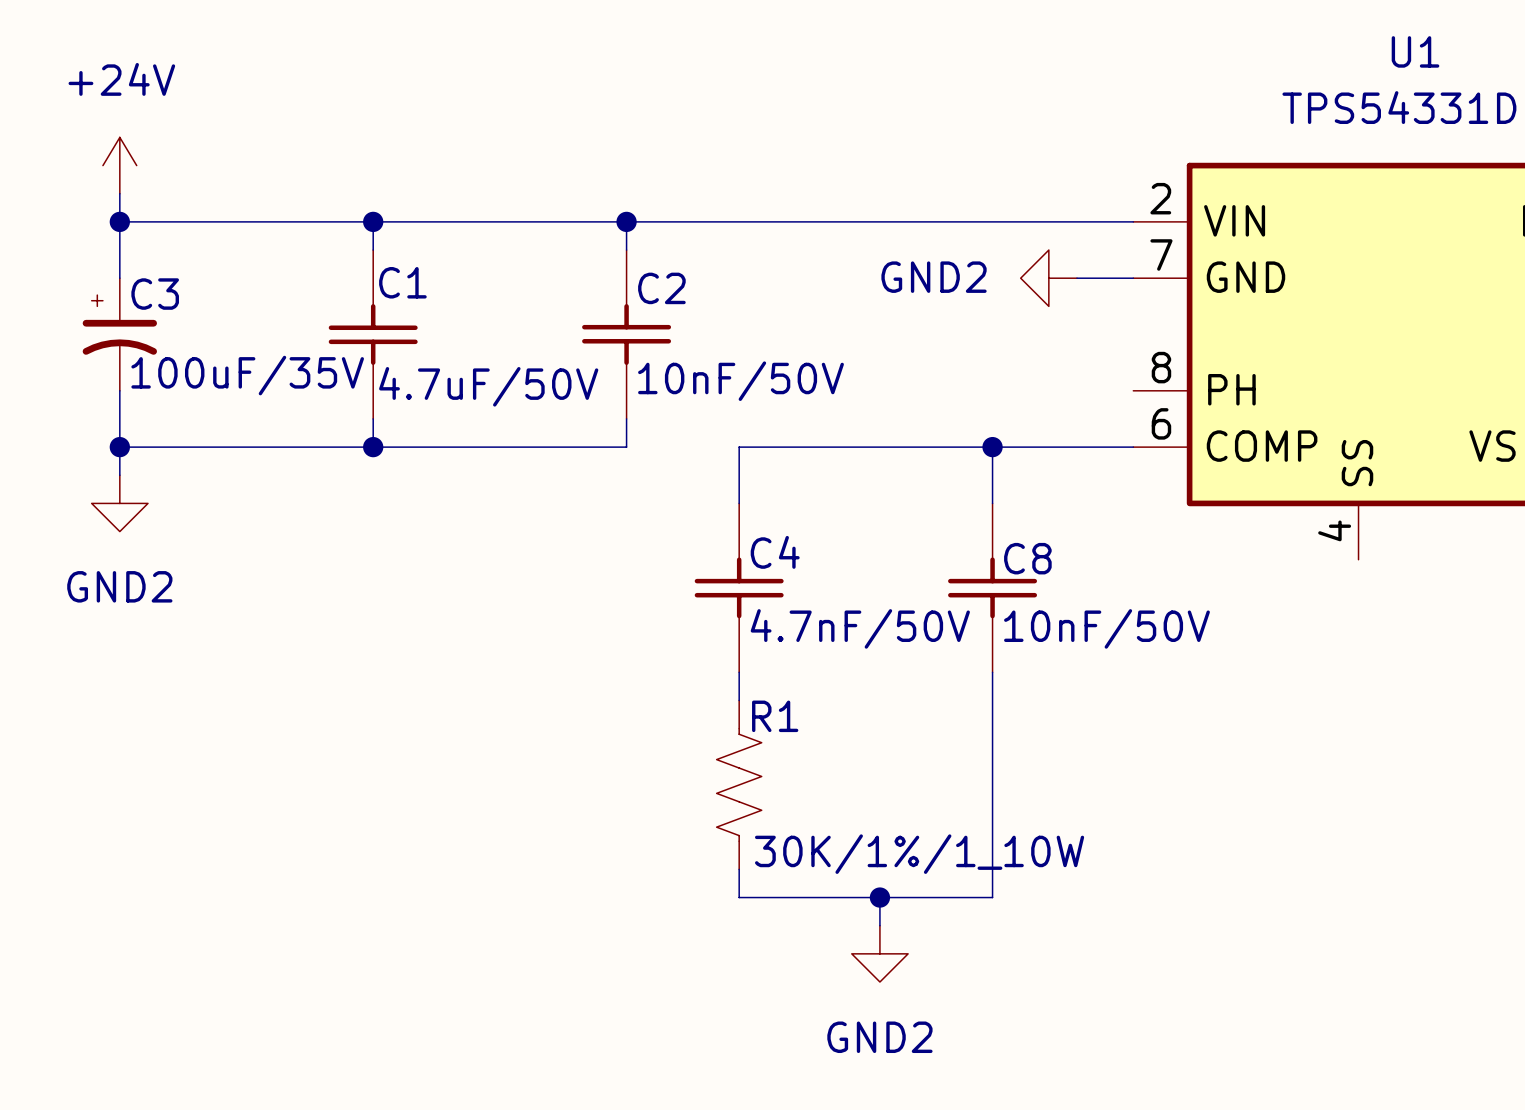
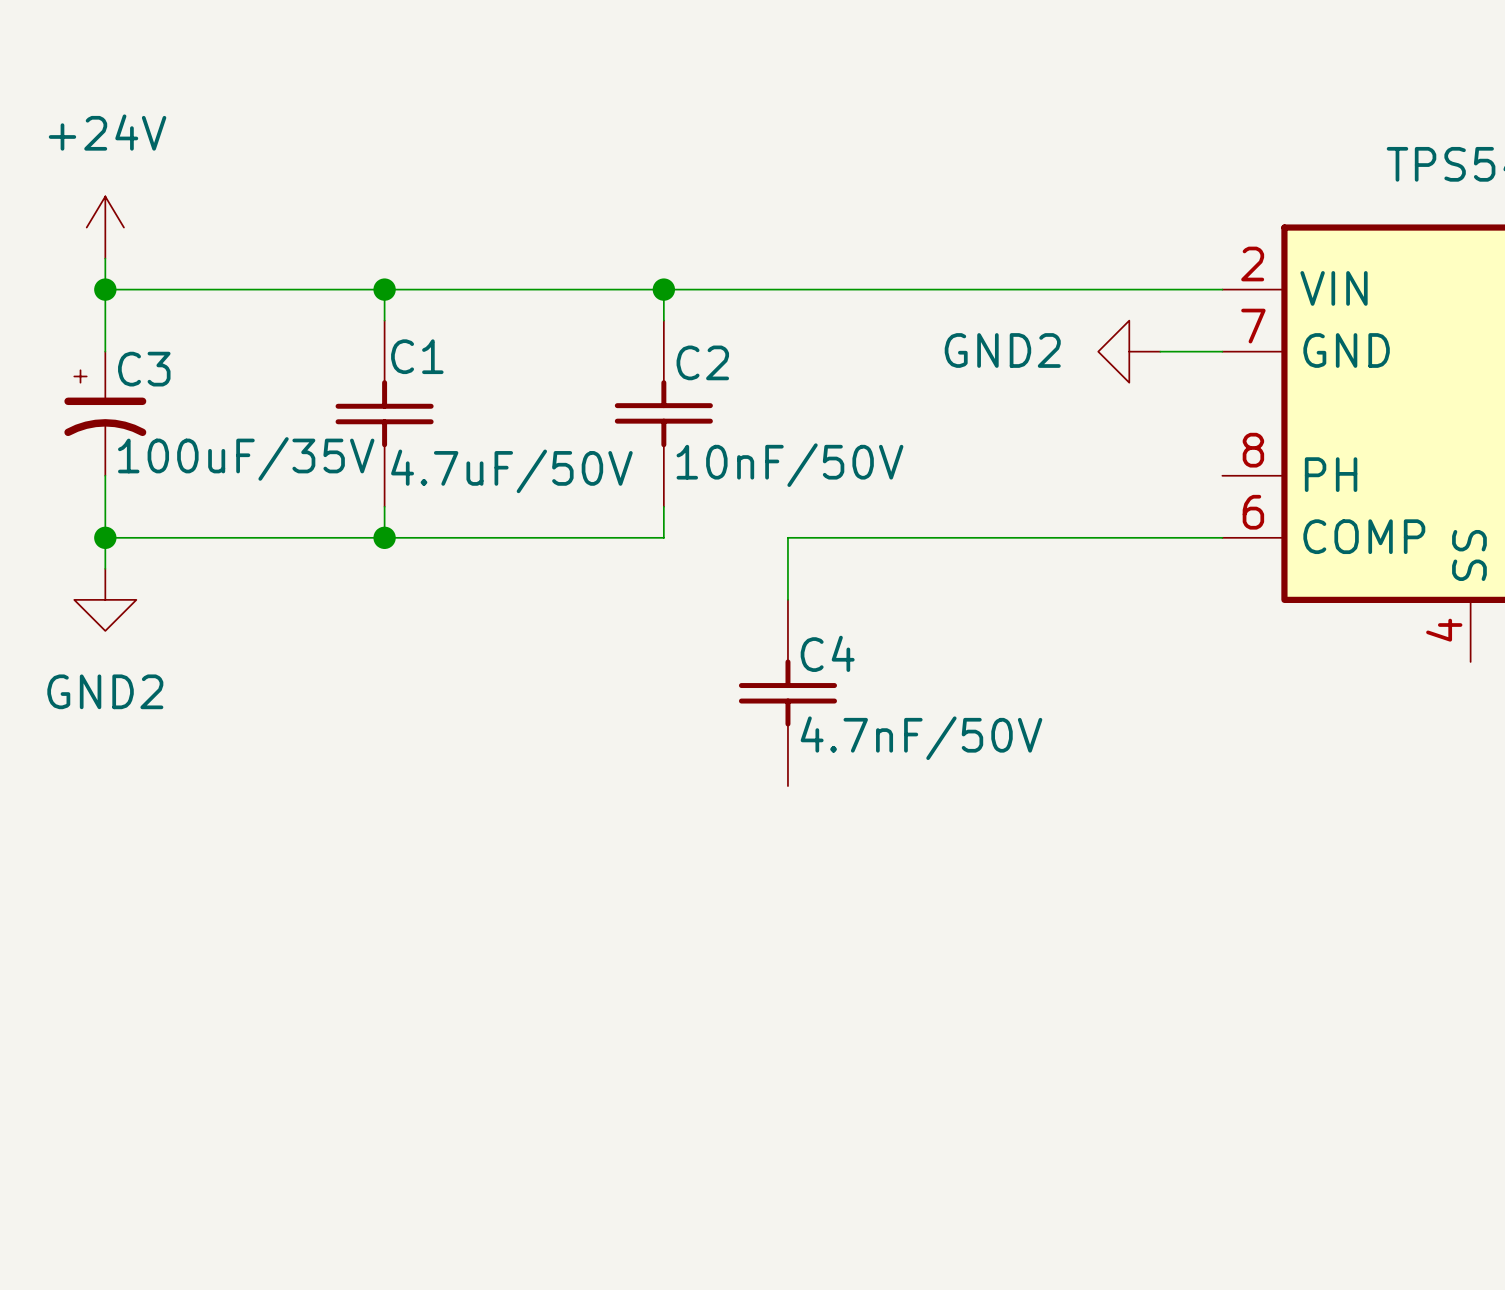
wire: (992, 447) (992, 503) -> none
junction: (992, 447) -> none
C8: 10nF/50V (992, 587) -> none
wire: (739, 672) (739, 700) -> none
wire: (992, 672) (992, 897) (739, 897) (739, 869) -> none
R1: 30K/1%/1_10W (739, 784) -> none
wire: (879, 897) (879, 925) -> none
junction: (879, 897) -> none
power symbol: GND2 (879, 953) -> none

